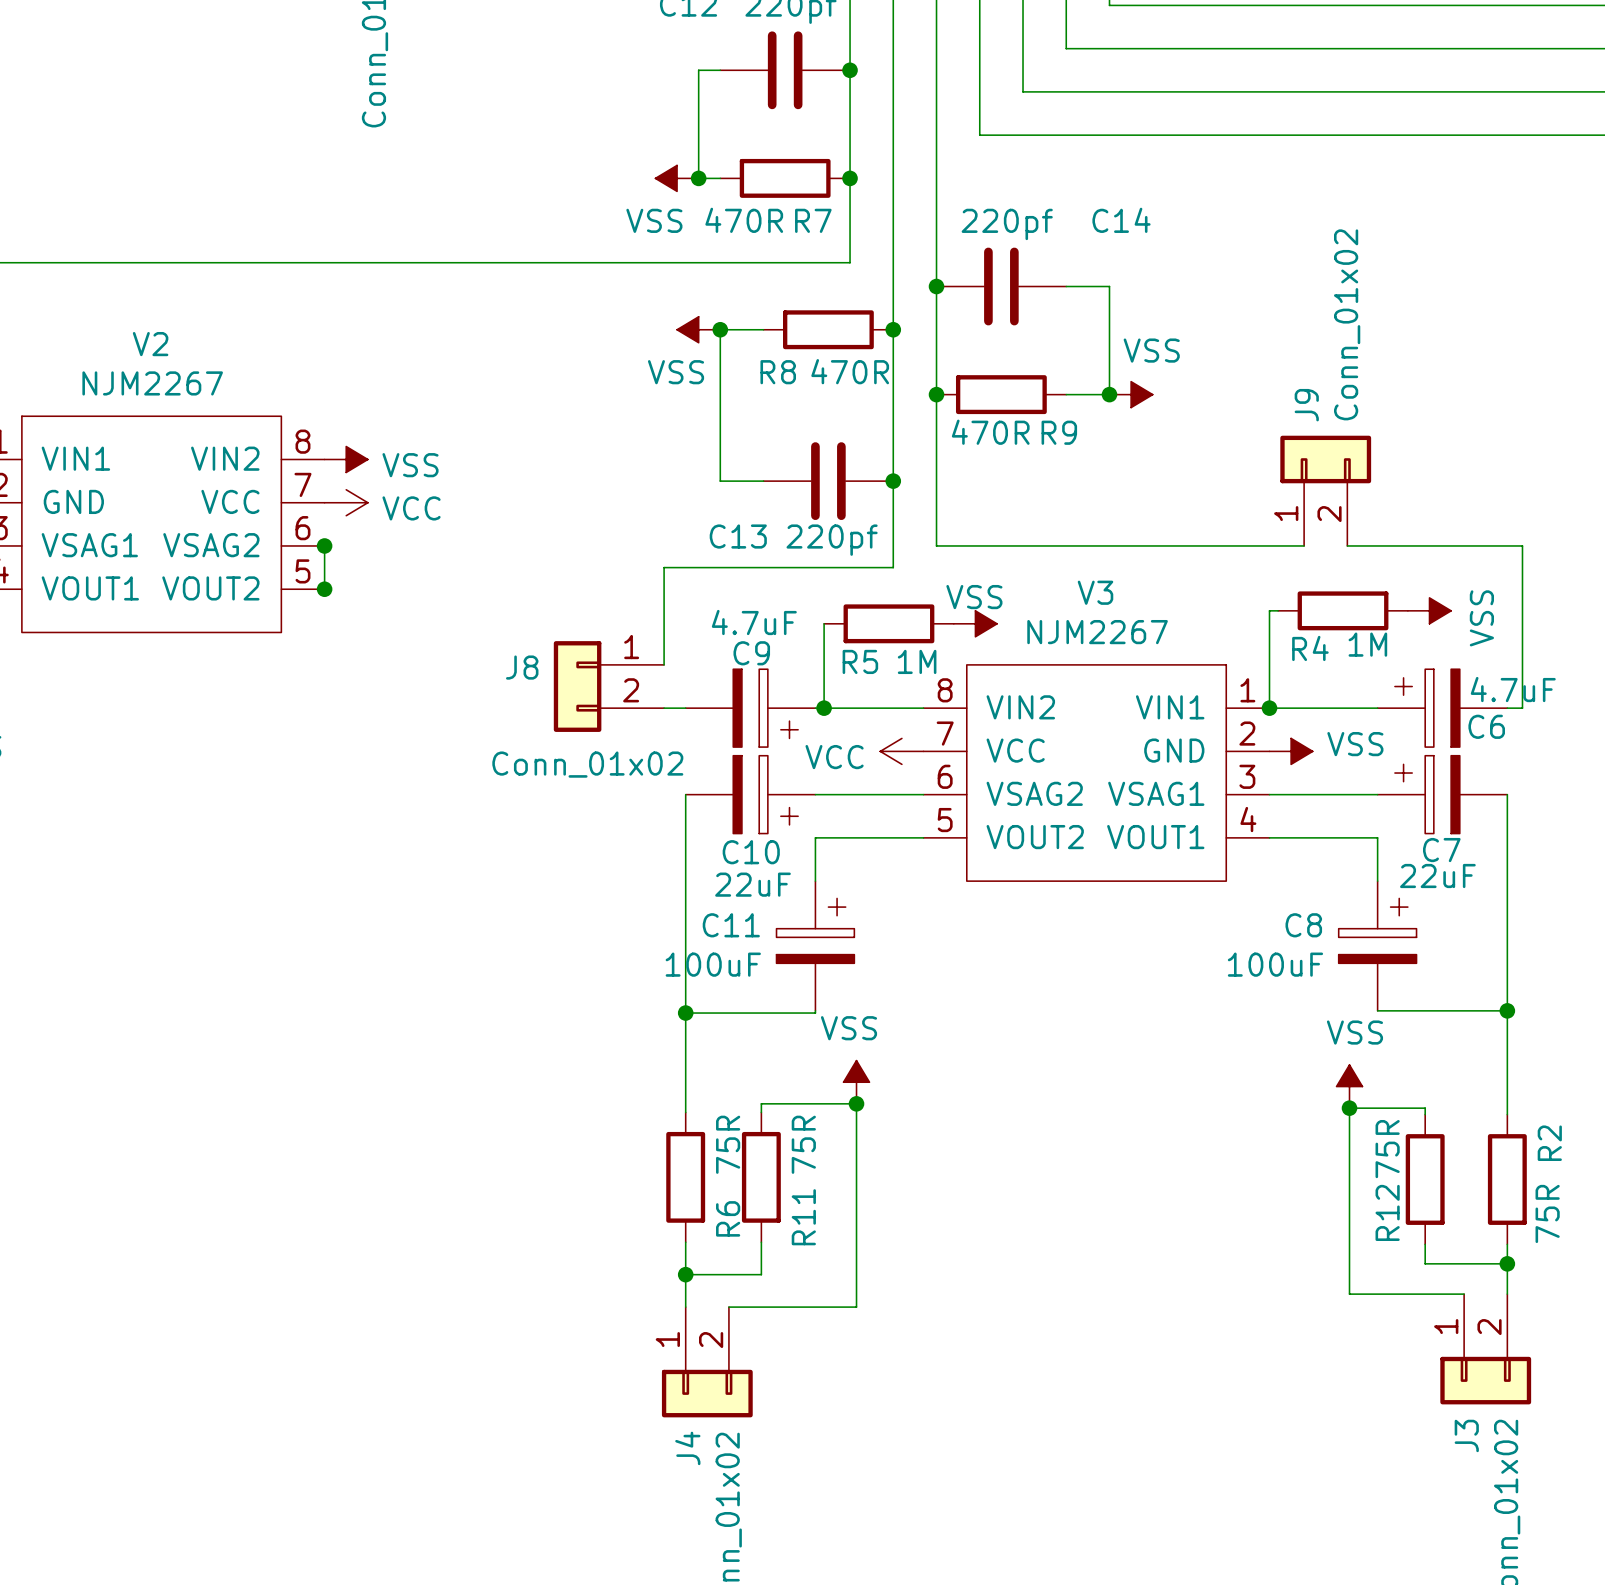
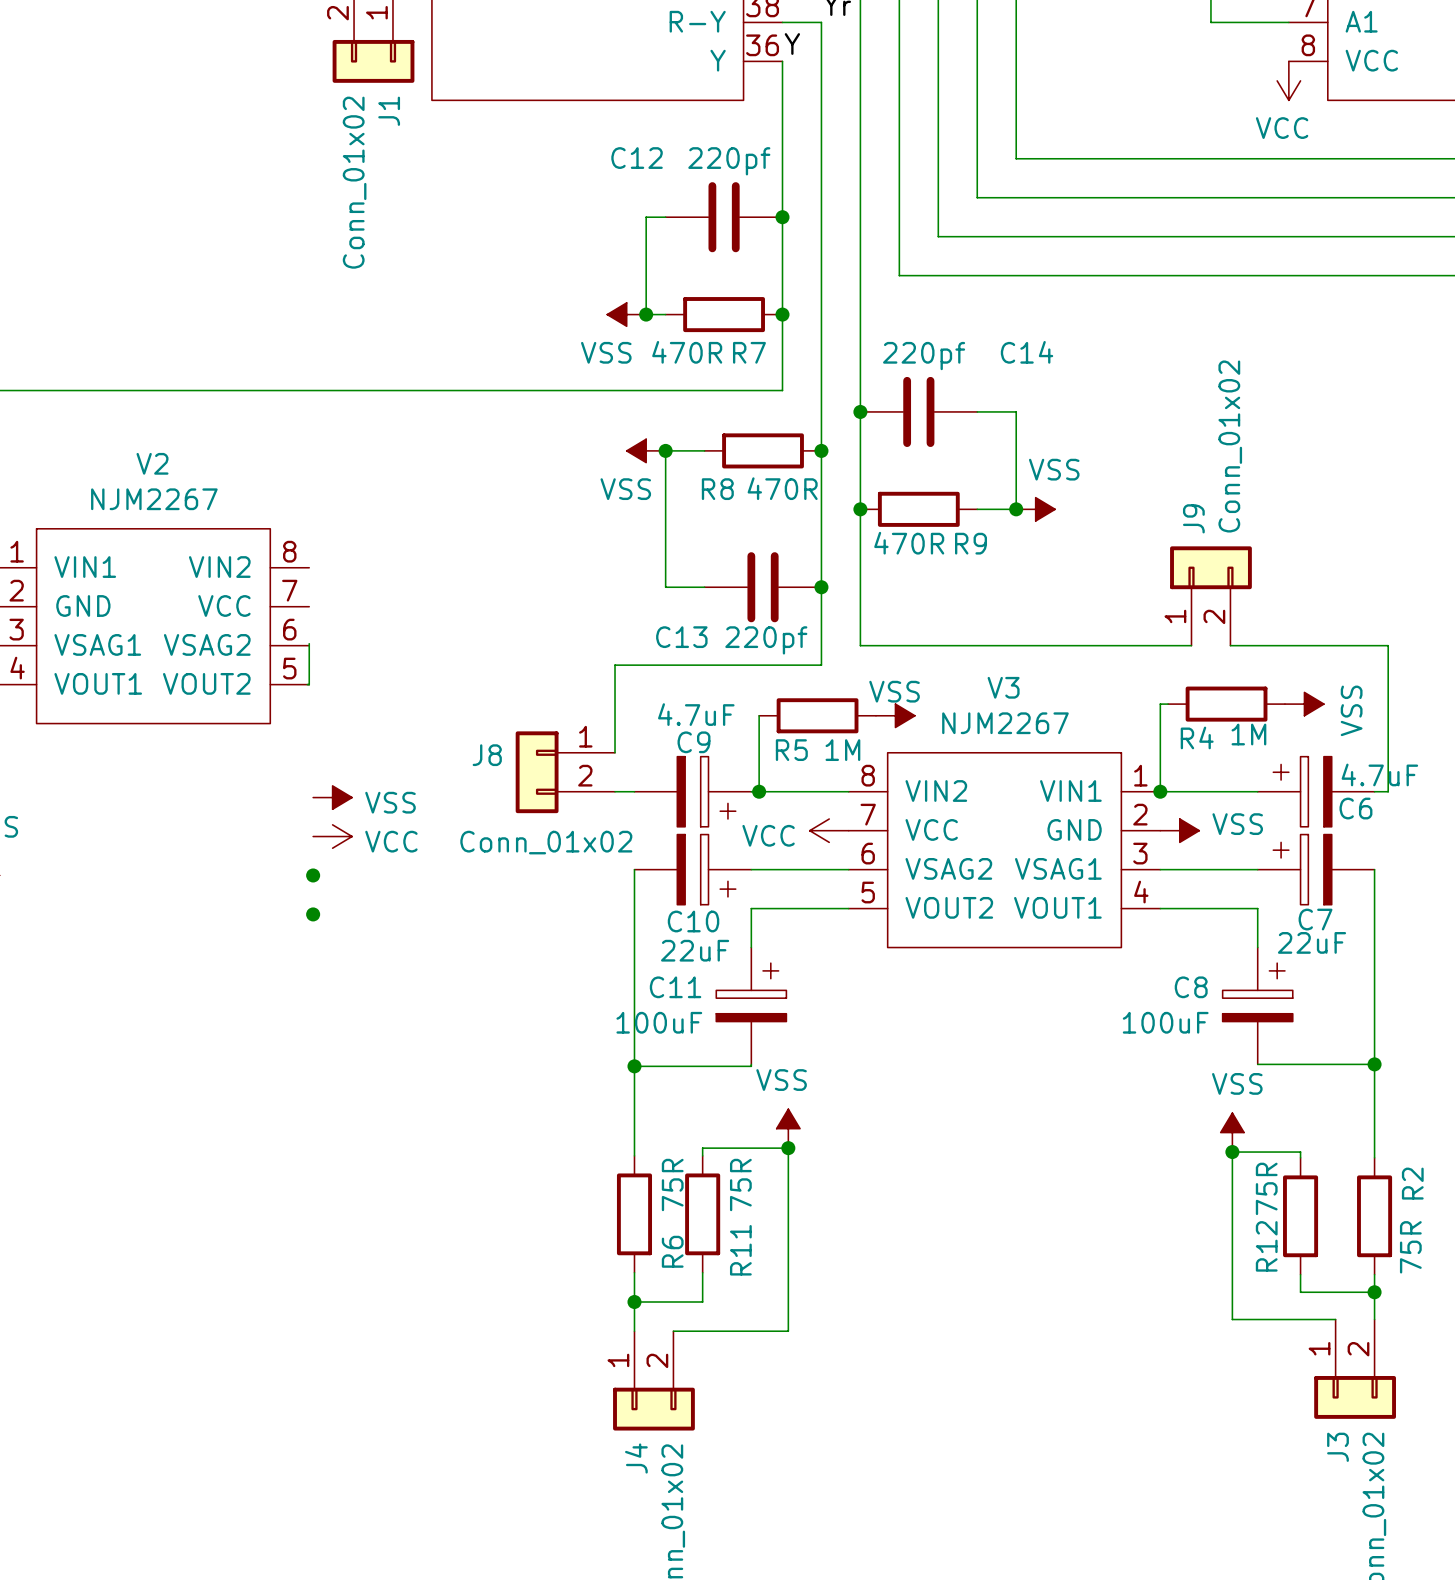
power symbol position: VSS (346, 459) -> VSS (332, 797)
power symbol position: VCC (346, 502) -> VCC (332, 836)
junction: (324, 545) -> none
junction: (324, 589) -> none
junction: none -> (313, 875)
junction: none -> (313, 914)

